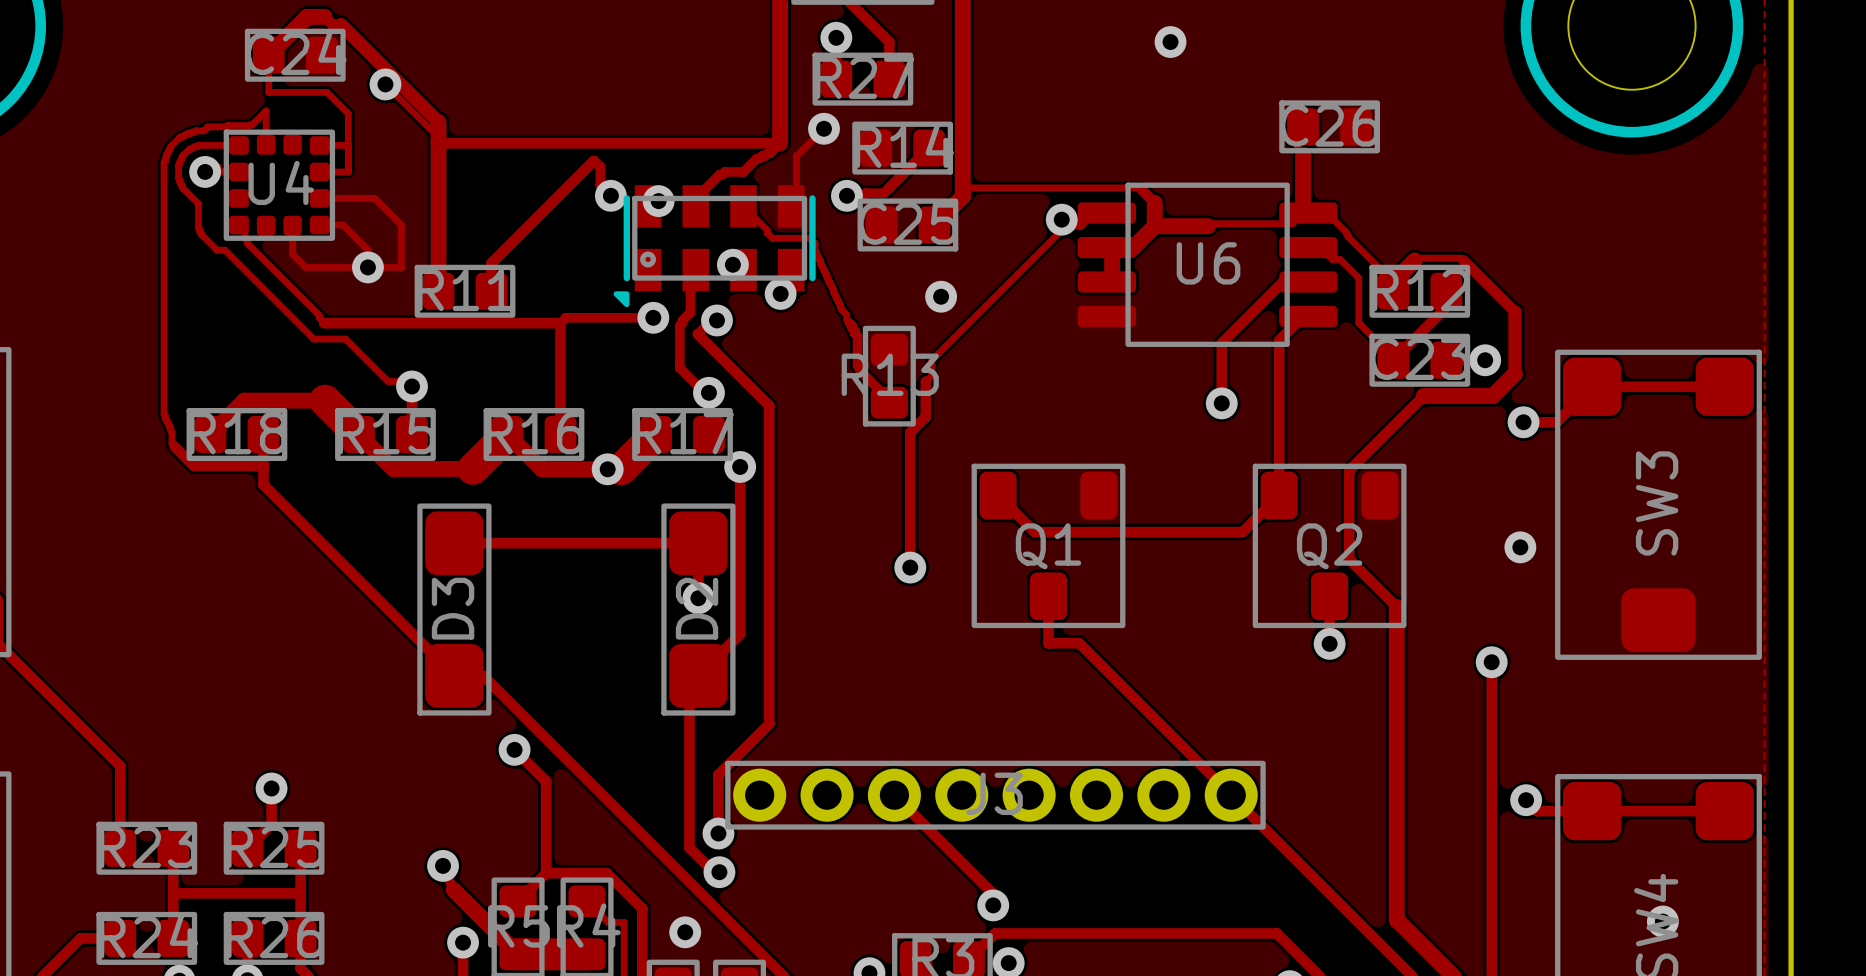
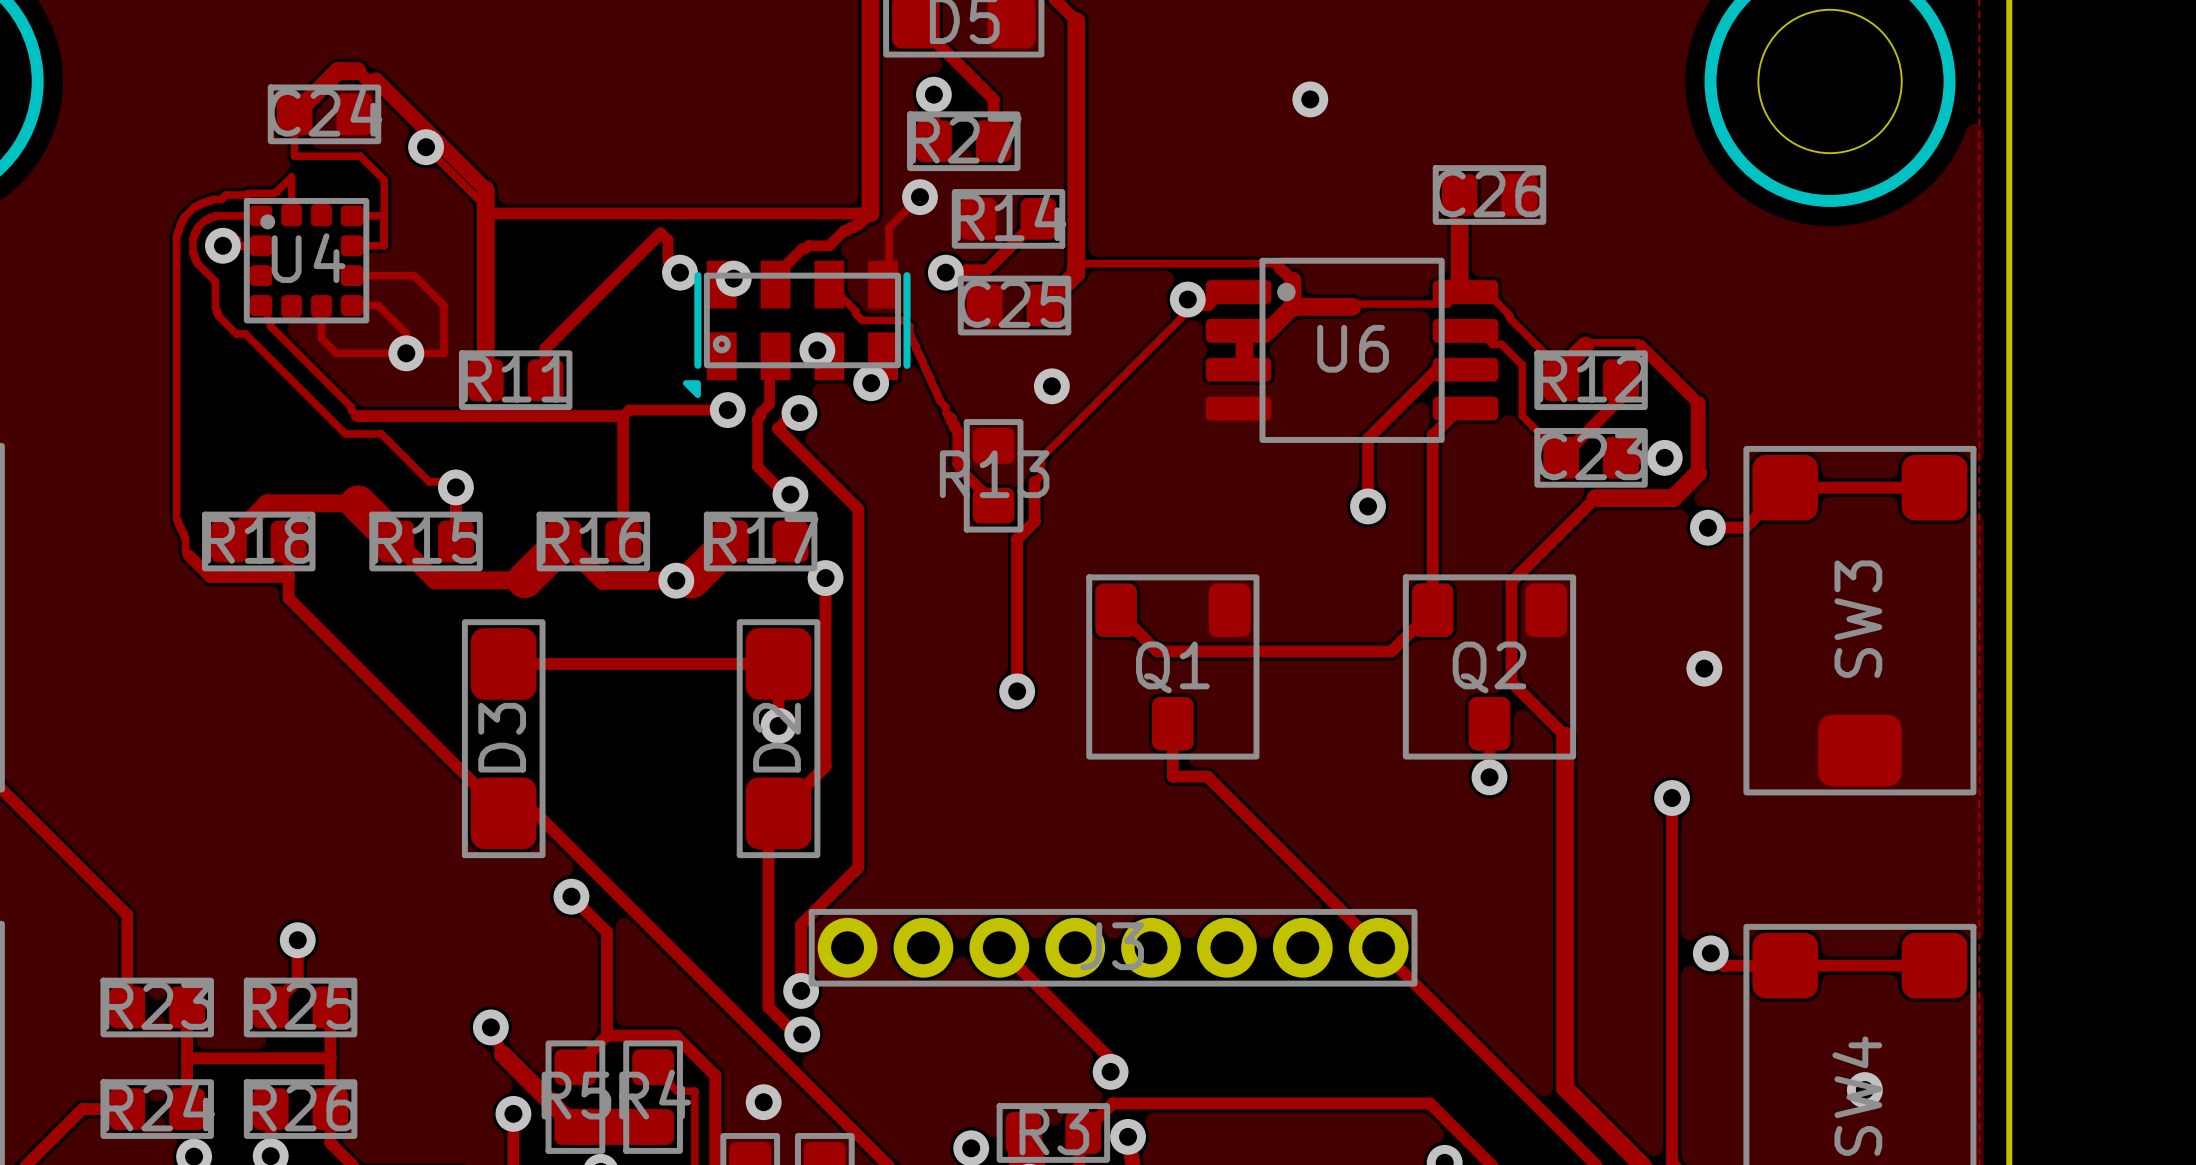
U4 footprint: [223, 129, 336, 241] -> [243, 197, 370, 324]
U6 footprint: [1077, 182, 1338, 347] -> [1205, 257, 1499, 443]

